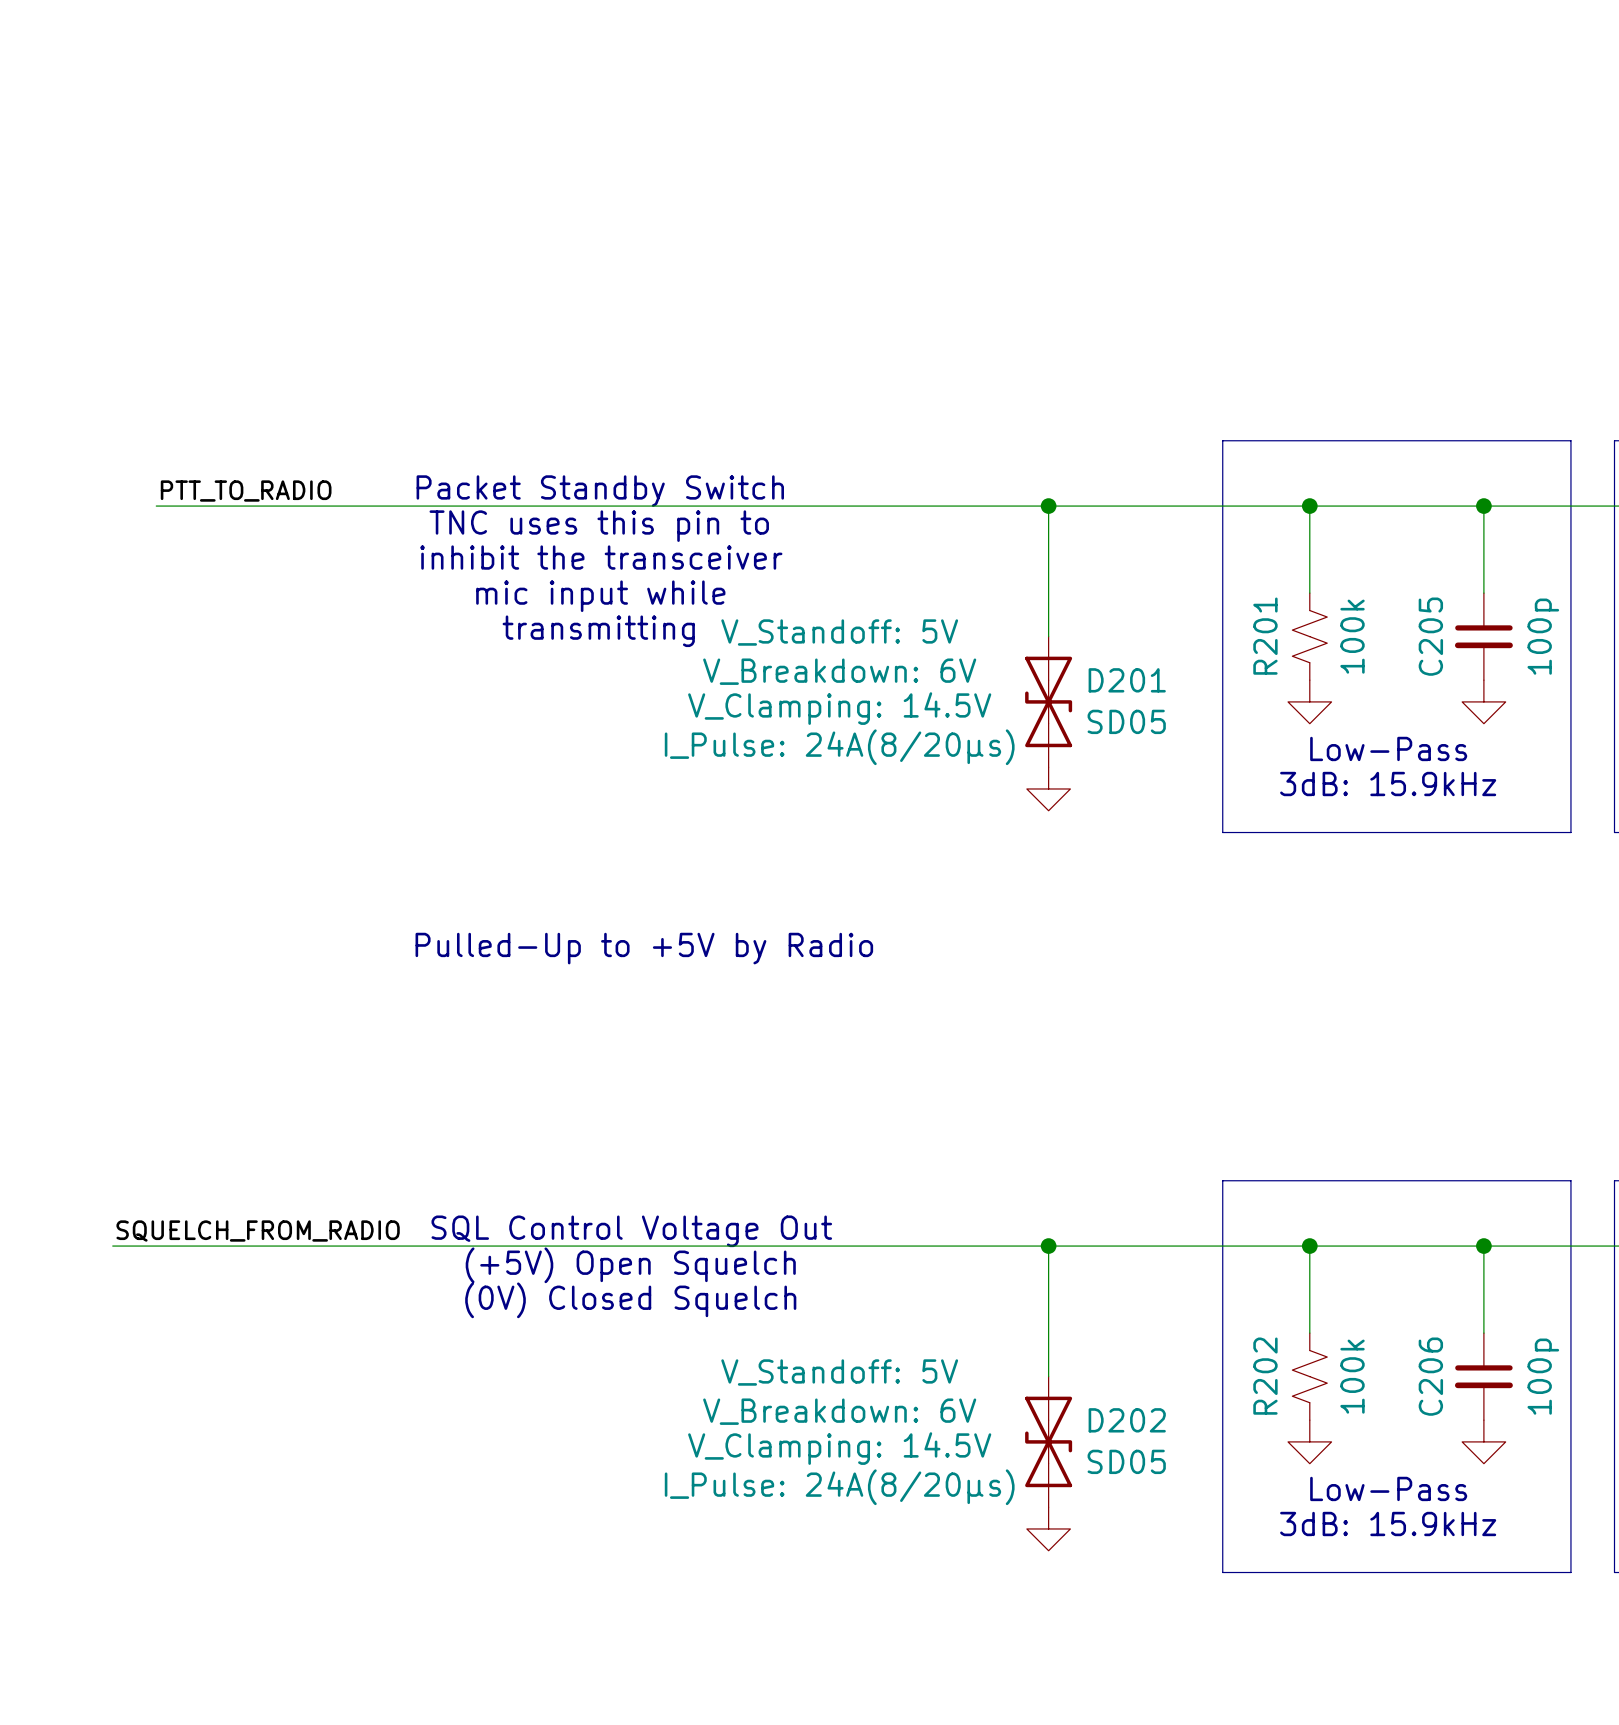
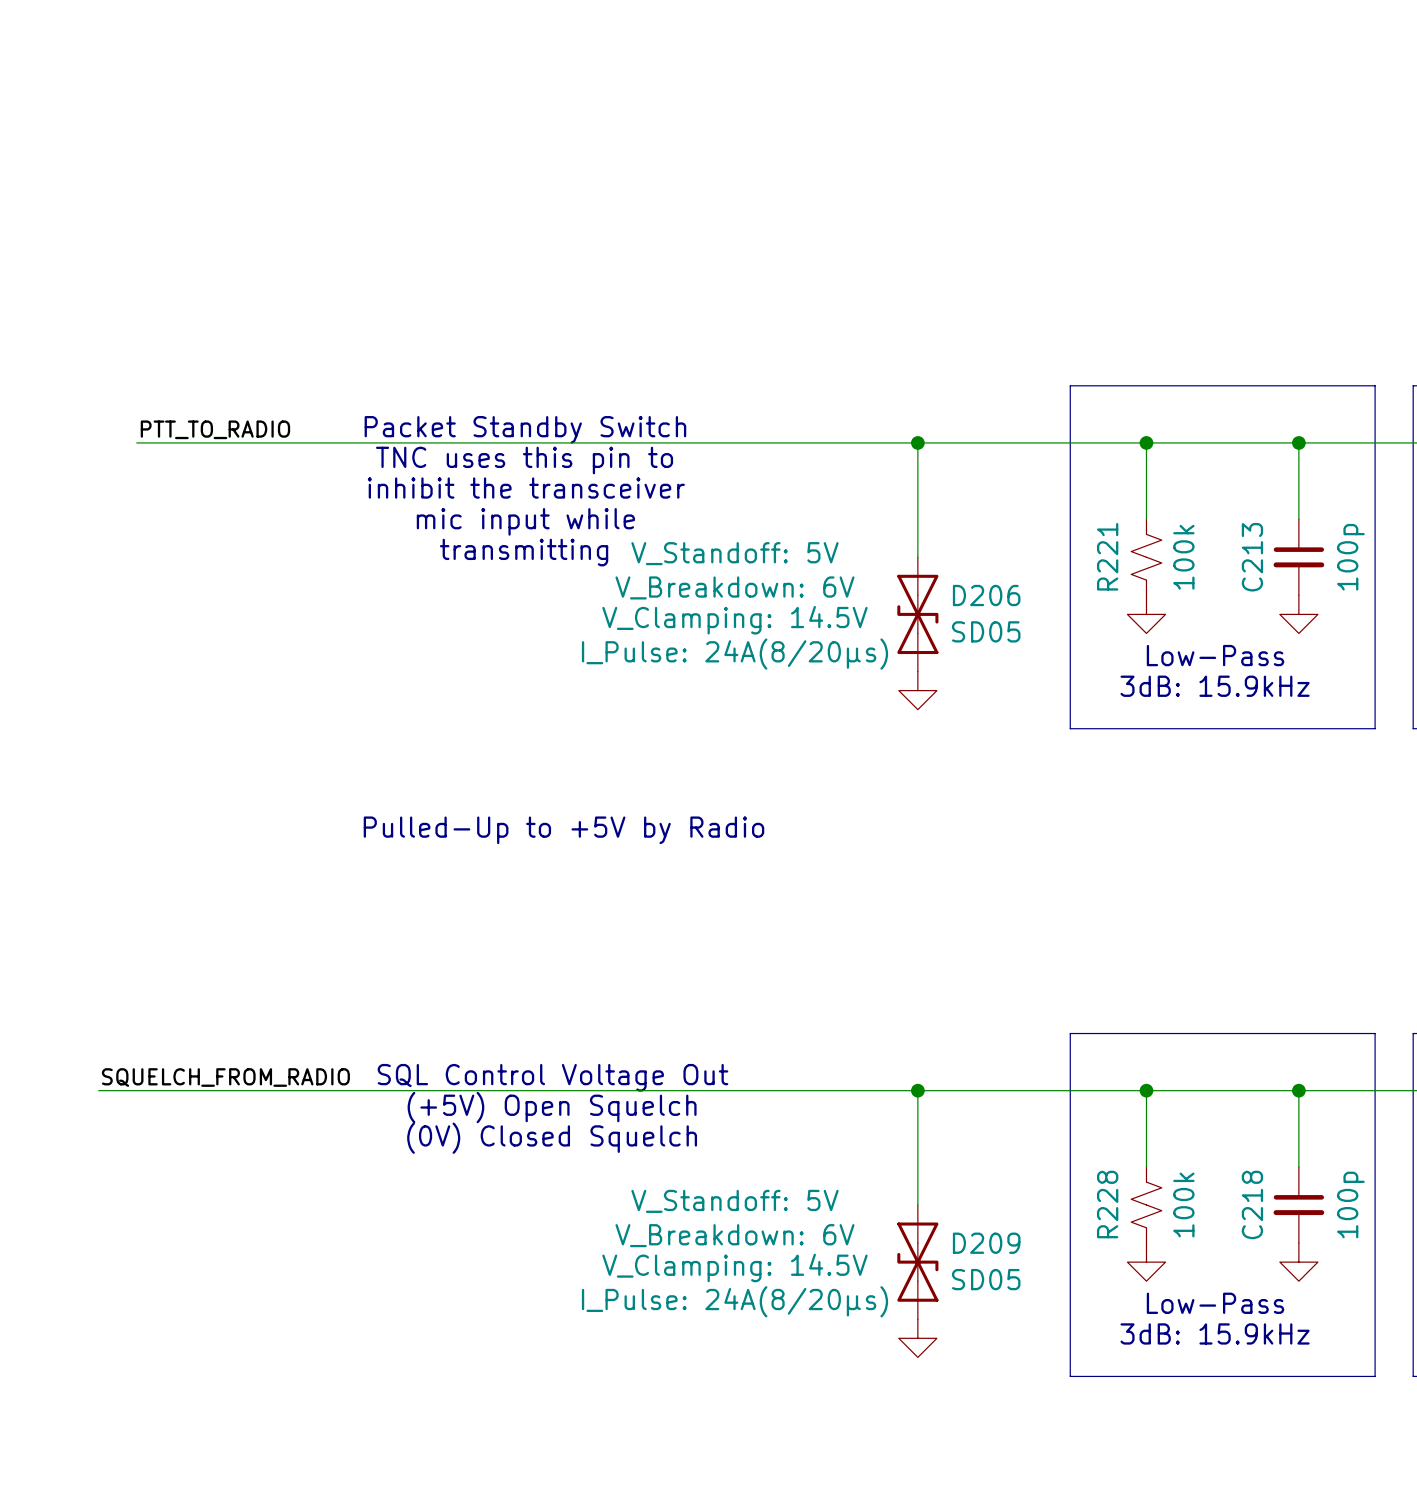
R201 name: R201 (1265, 636) -> R221 (1107, 556)
C205 name: C205 (1430, 636) -> C213 (1252, 557)
D201 name: D201 (1127, 680) -> D206 (986, 595)
R202 name: R202 (1265, 1376) -> R228 (1107, 1204)
C206 name: C206 (1430, 1376) -> C218 (1252, 1204)
D202 name: D202 (1127, 1420) -> D209 (986, 1243)

